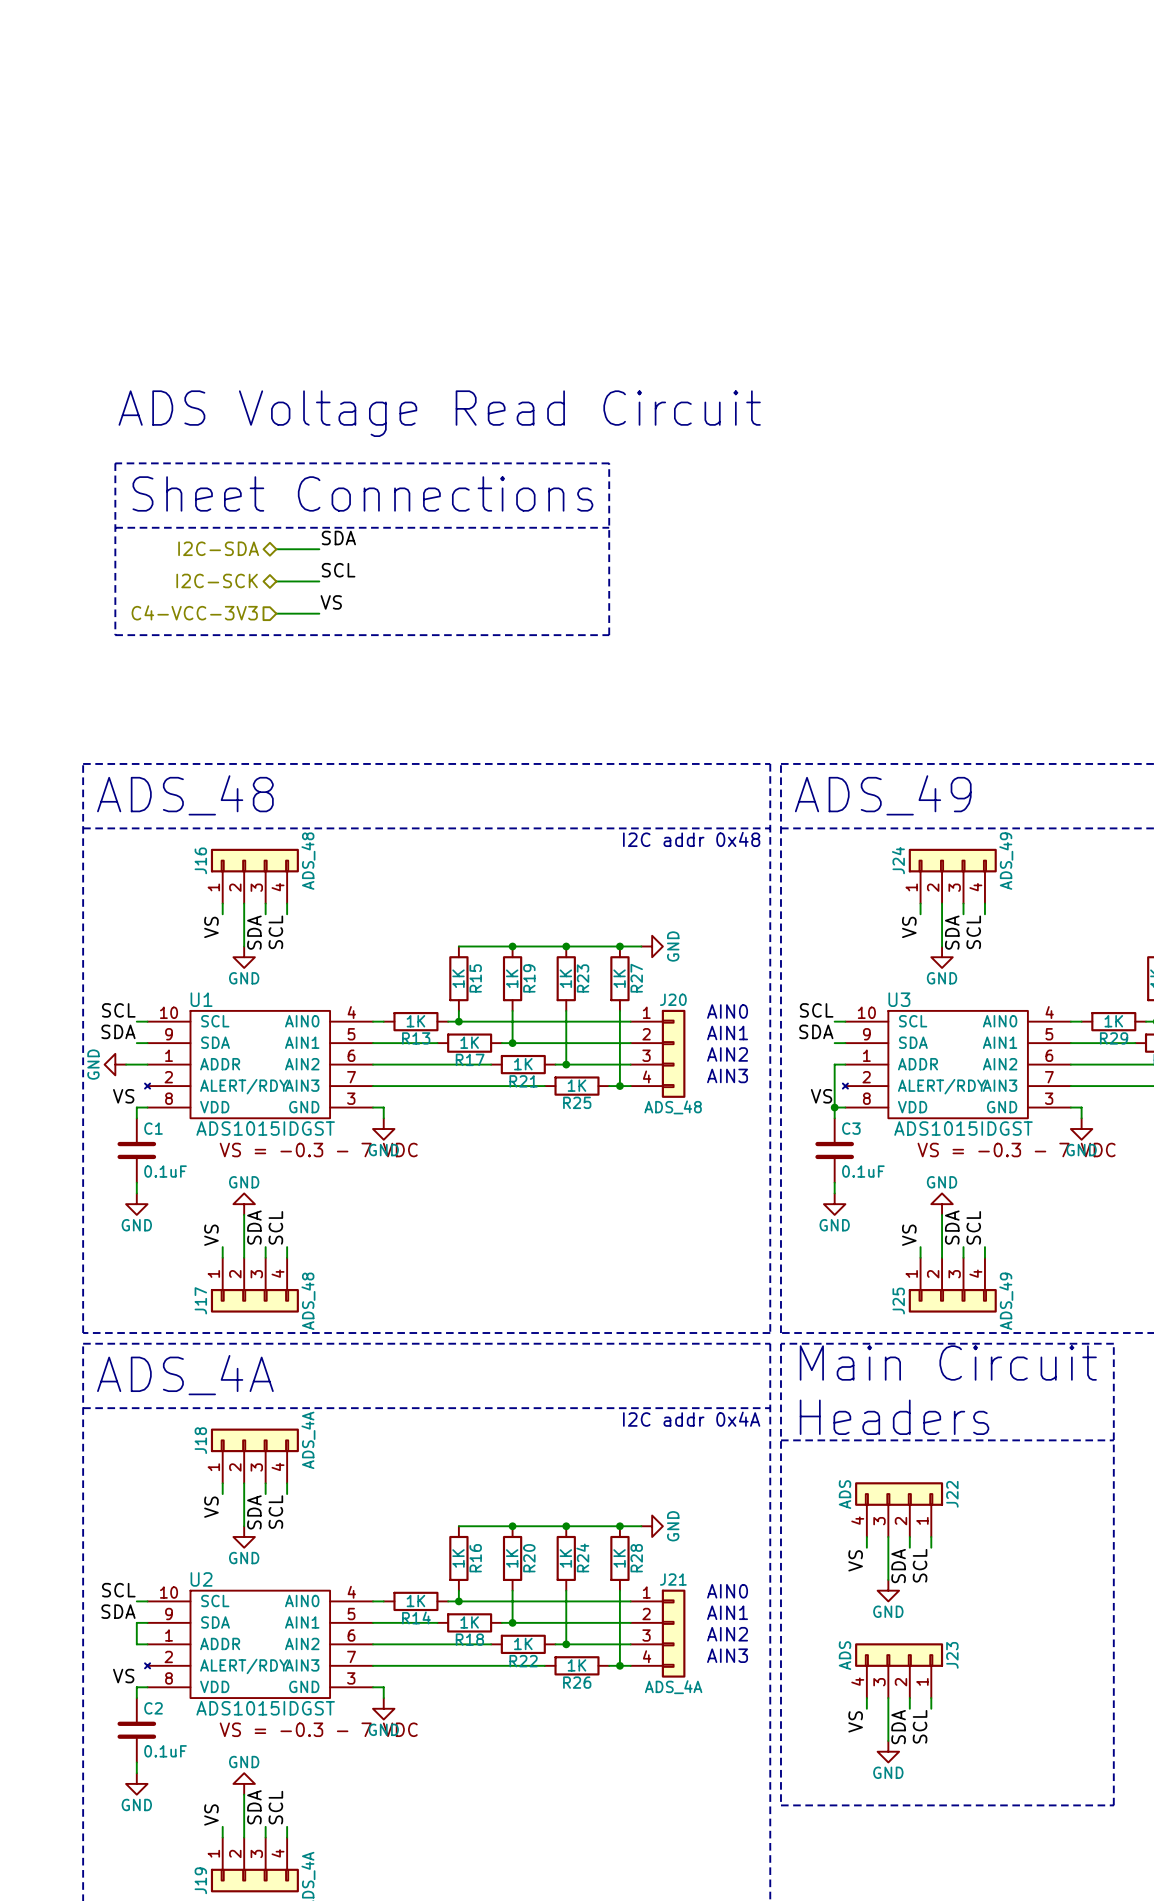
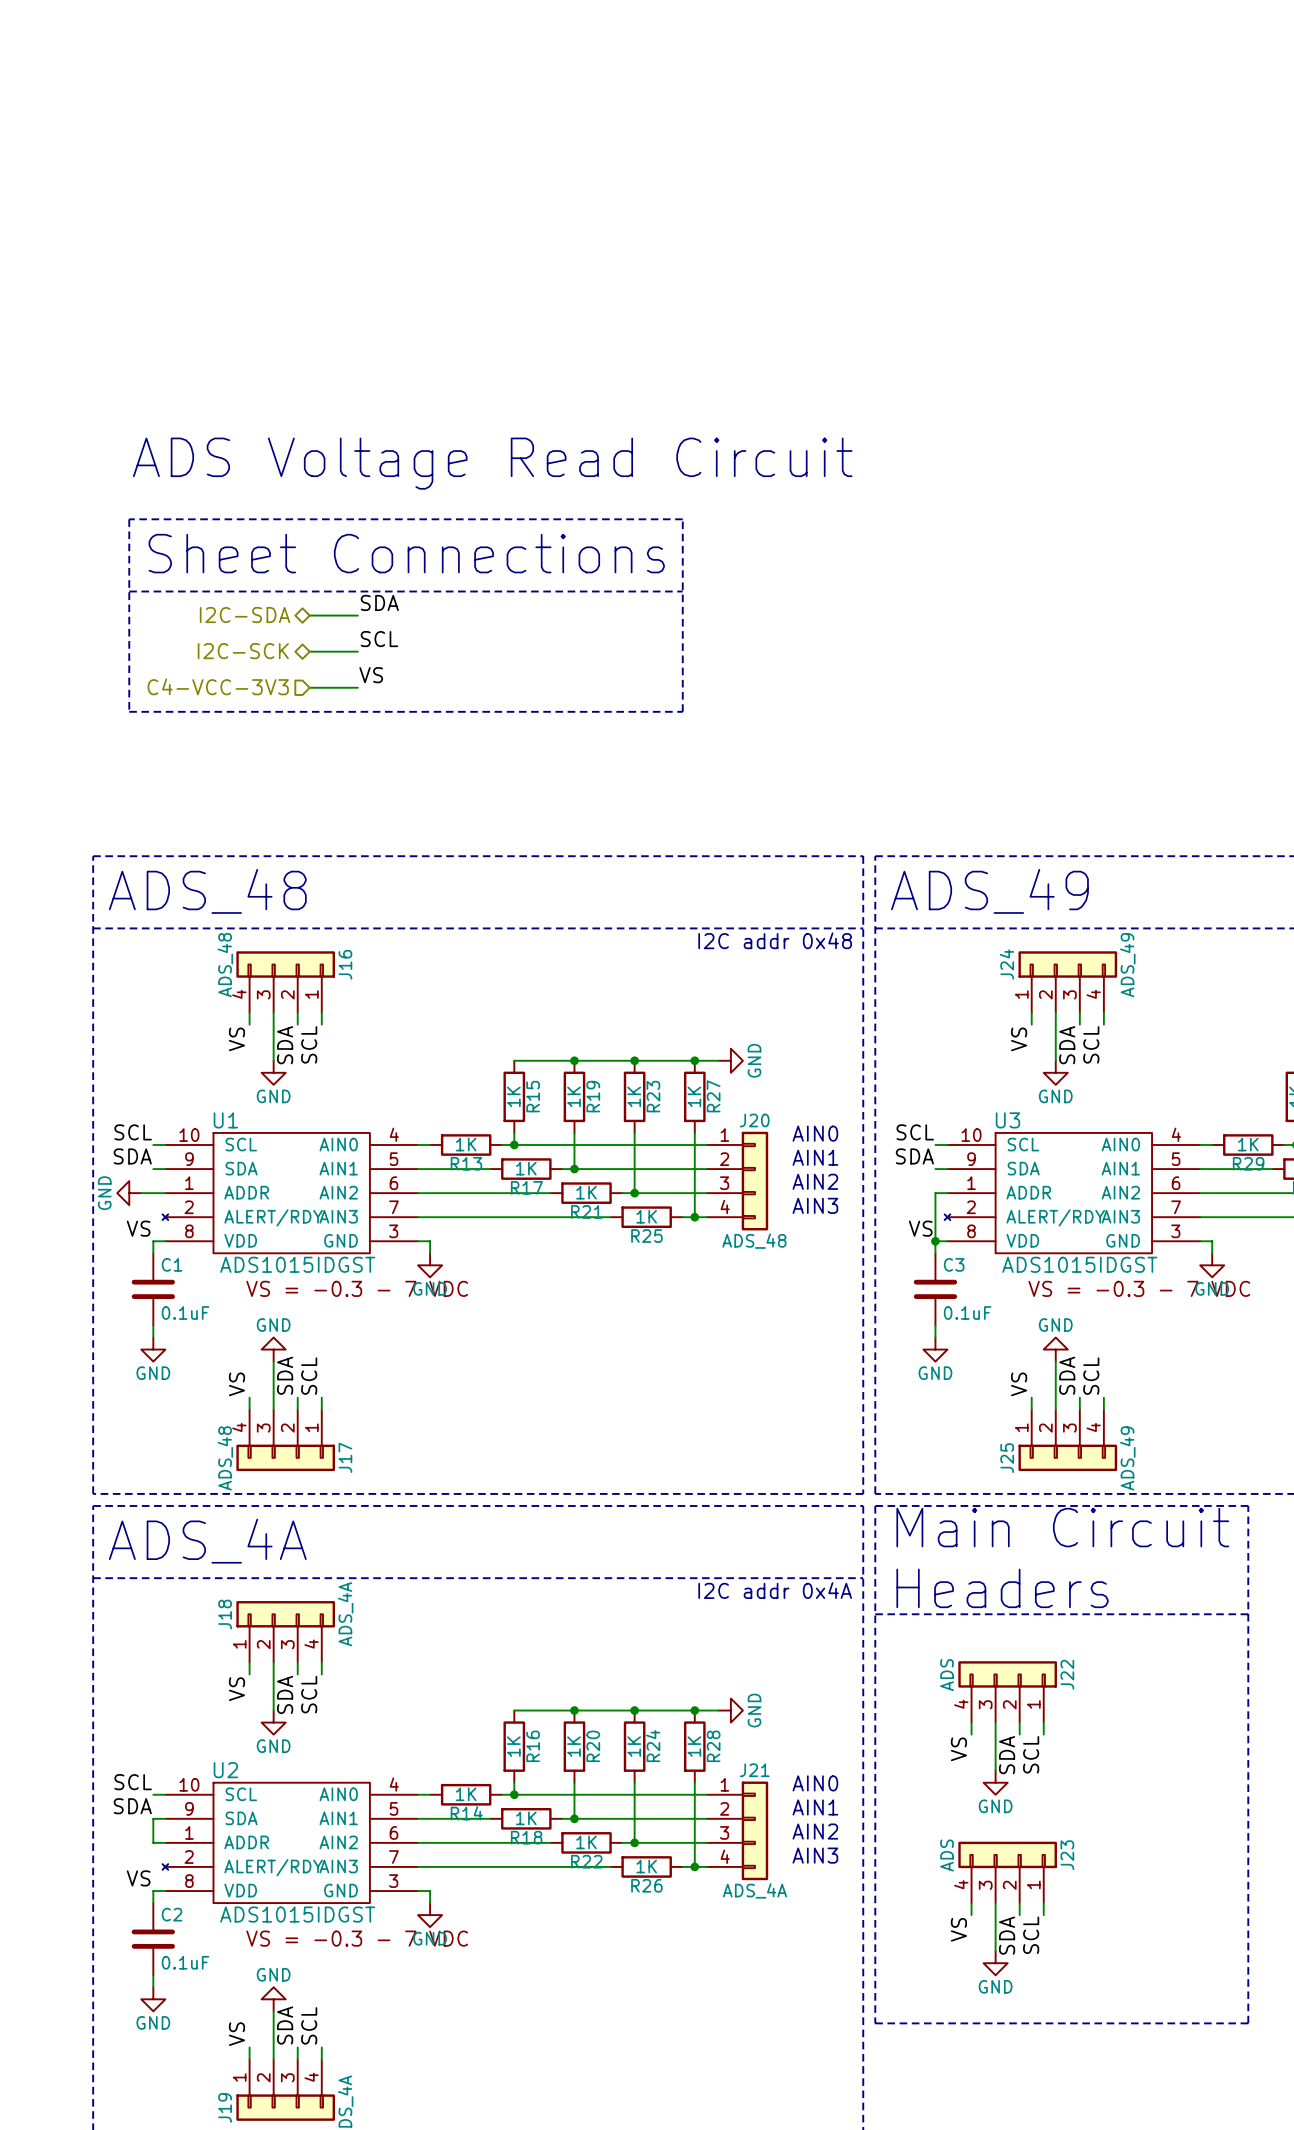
J16 flip: as is (254, 860) -> left-right (285, 964)
J17 flip: as is (254, 1300) -> left-right (285, 1457)

